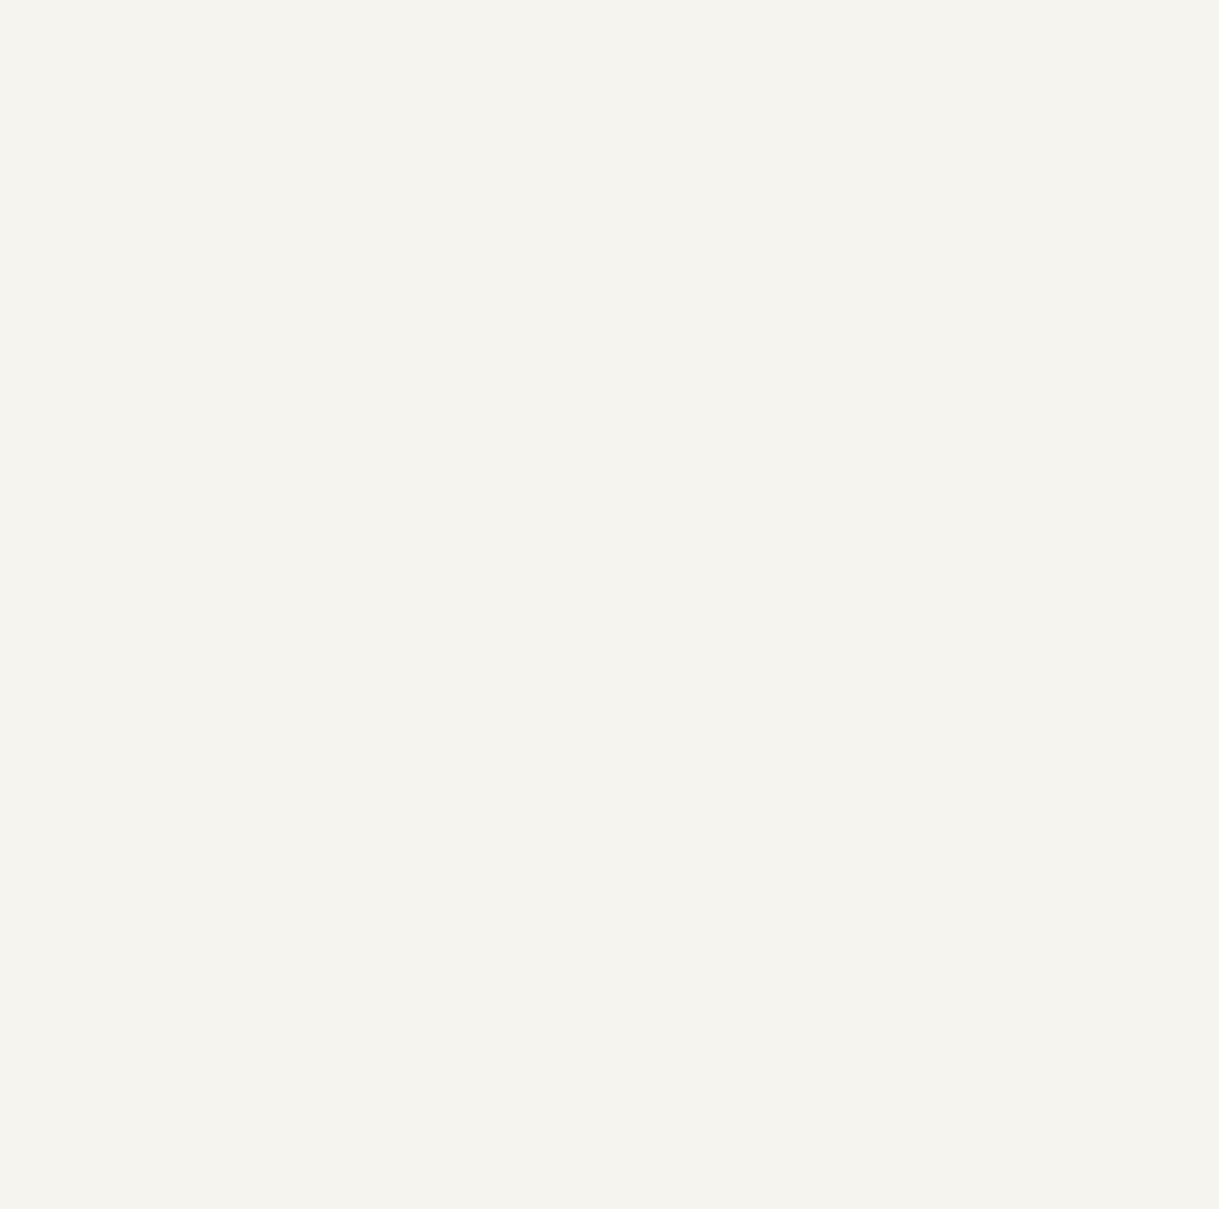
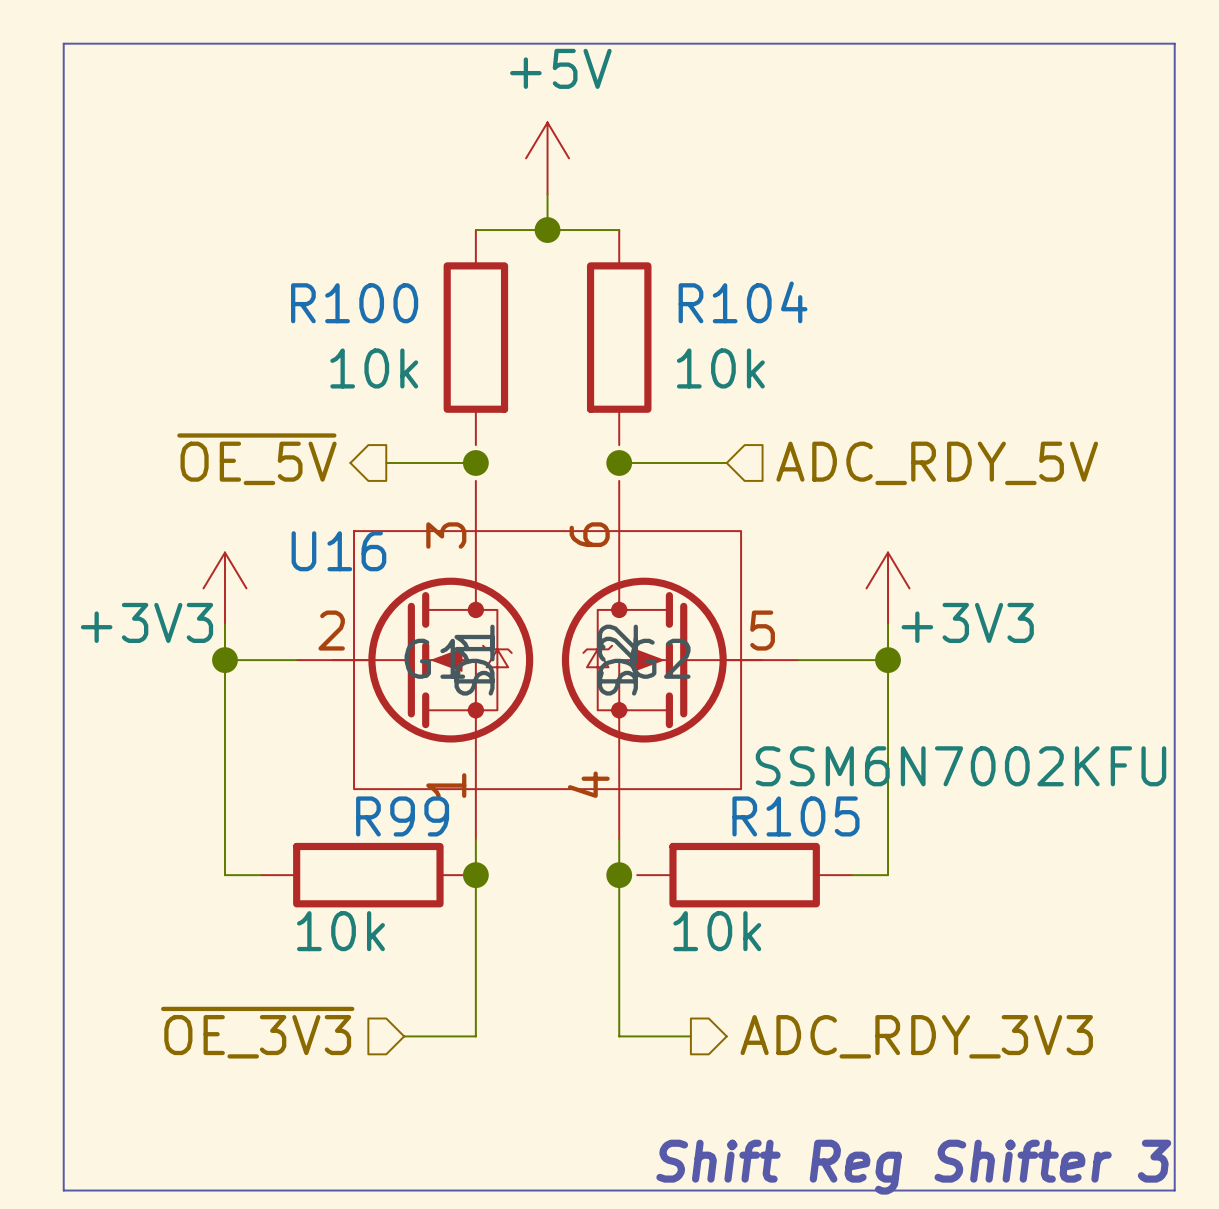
line: none -> (63, 43) (63, 1190) (1174, 1190) (1174, 43) (63, 43)
power symbol: none -> +5V (547, 158)
wire: none -> (547, 194) (547, 230)
wire: none -> (475, 230) (619, 230)
junction: none -> (547, 230)
R100: none -> 10k (475, 337)
R104: none -> 10k (619, 337)
hierarchical label: none -> ~{OE_5V} (256, 459)
wire: none -> (386, 462) (475, 462)
junction: none -> (475, 462)
wire: none -> (619, 462) (726, 462)
junction: none -> (619, 462)
hierarchical label: none -> ADC_RDY_5V (937, 463)
power symbol: none -> +3V3 (224, 588)
power symbol: none -> +3V3 (888, 588)
wire: none -> (224, 624) (224, 875) (260, 875)
wire: none -> (888, 624) (888, 875) (852, 875)
wire: none -> (224, 660) (296, 660)
junction: none -> (224, 660)
U16: none -> SSM6N7002KFU (547, 660)
wire: none -> (798, 660) (888, 660)
junction: none -> (888, 660)
wire: none -> (475, 839) (475, 1036) (404, 1036)
wire: none -> (619, 839) (619, 1036) (690, 1036)
R99: none -> 10k (368, 875)
junction: none -> (475, 875)
junction: none -> (619, 875)
R105: none -> 10k (744, 875)
hierarchical label: none -> ~{OE_3V3} (257, 1032)
hierarchical label: none -> ADC_RDY_3V3 (916, 1036)
text: none -> Shift Reg Shifter 3 (913, 1167)

